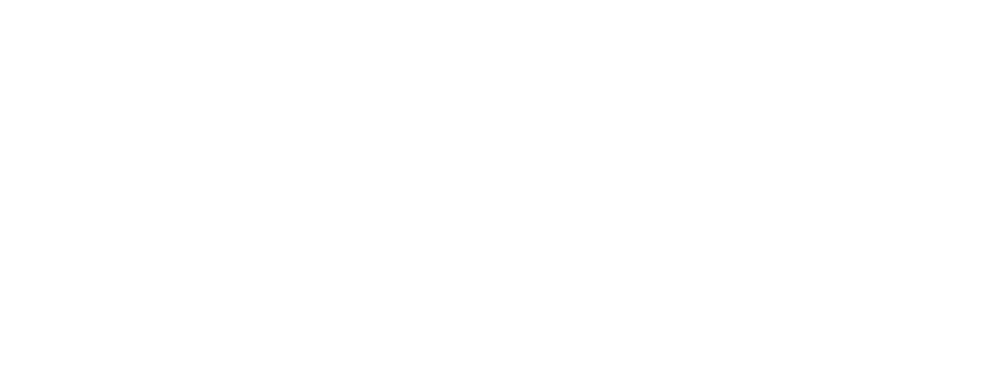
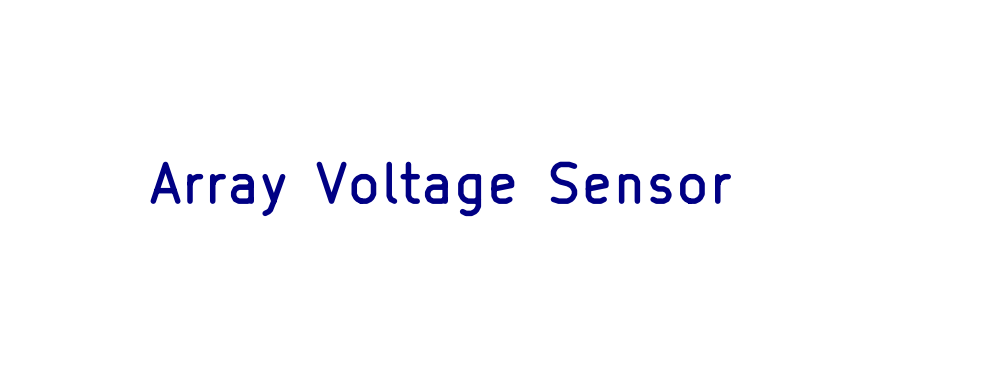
text: none -> Array Voltage Sensor (440, 188)

